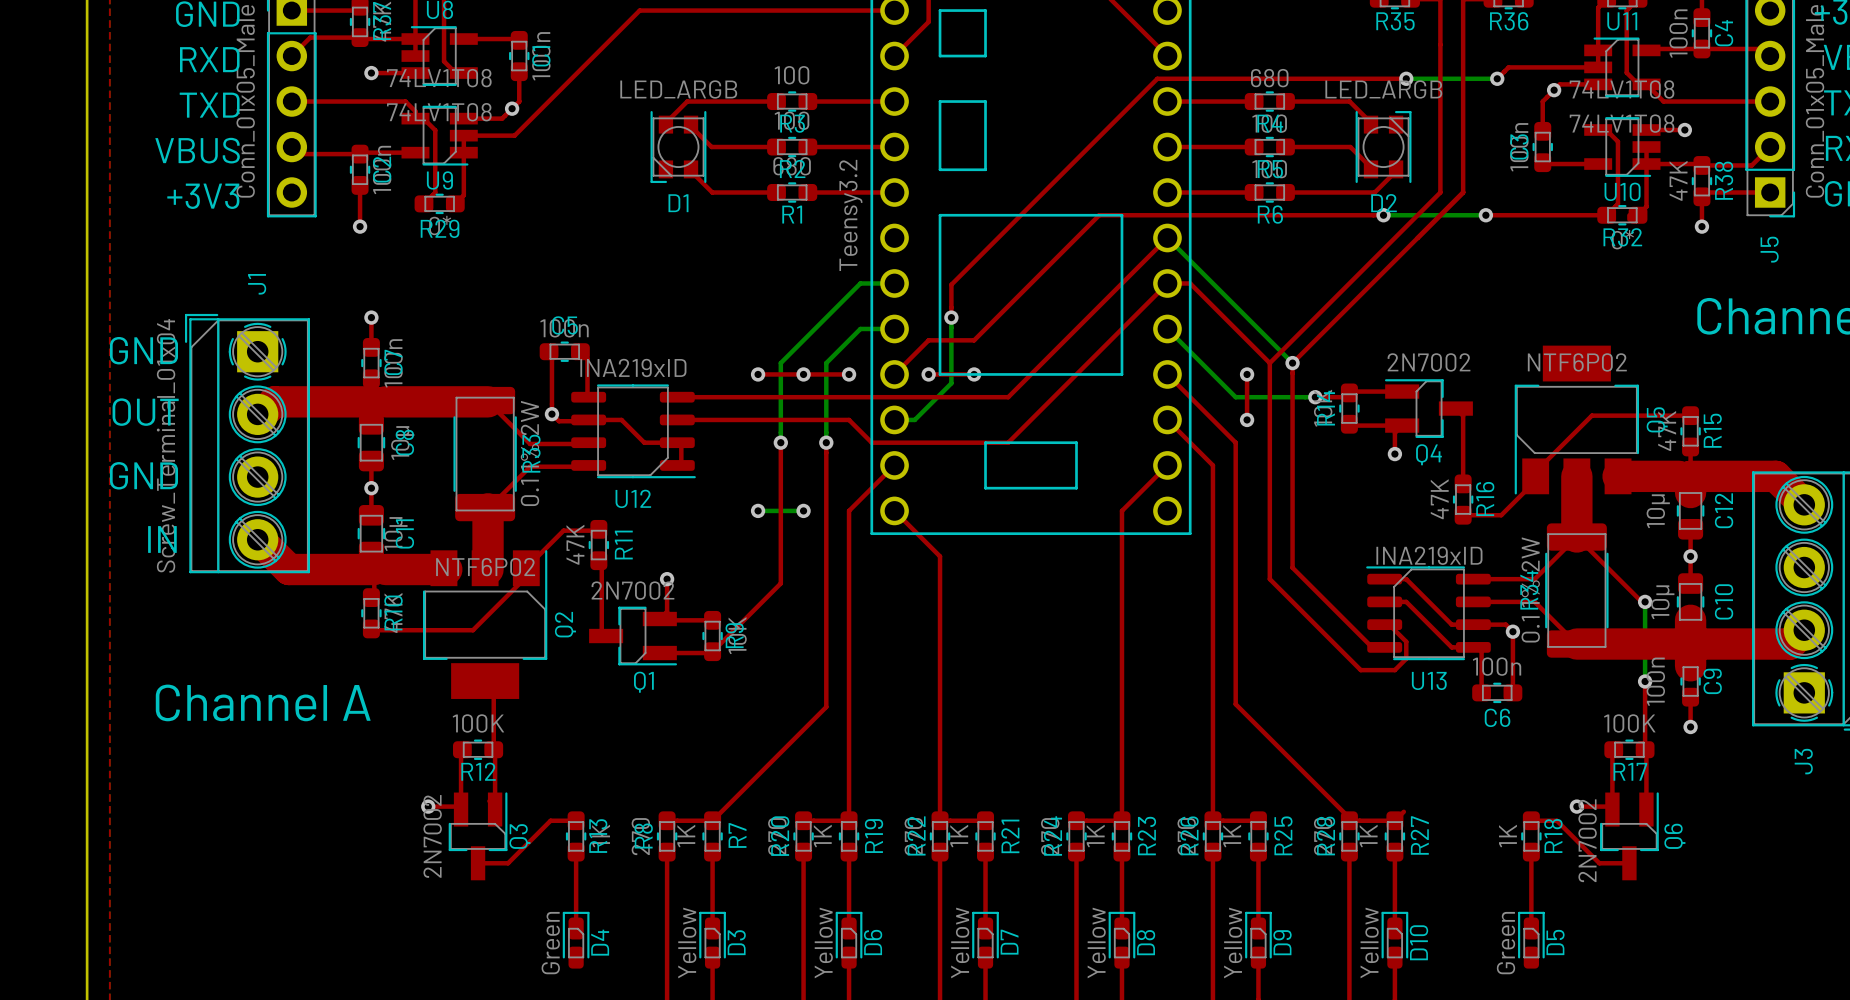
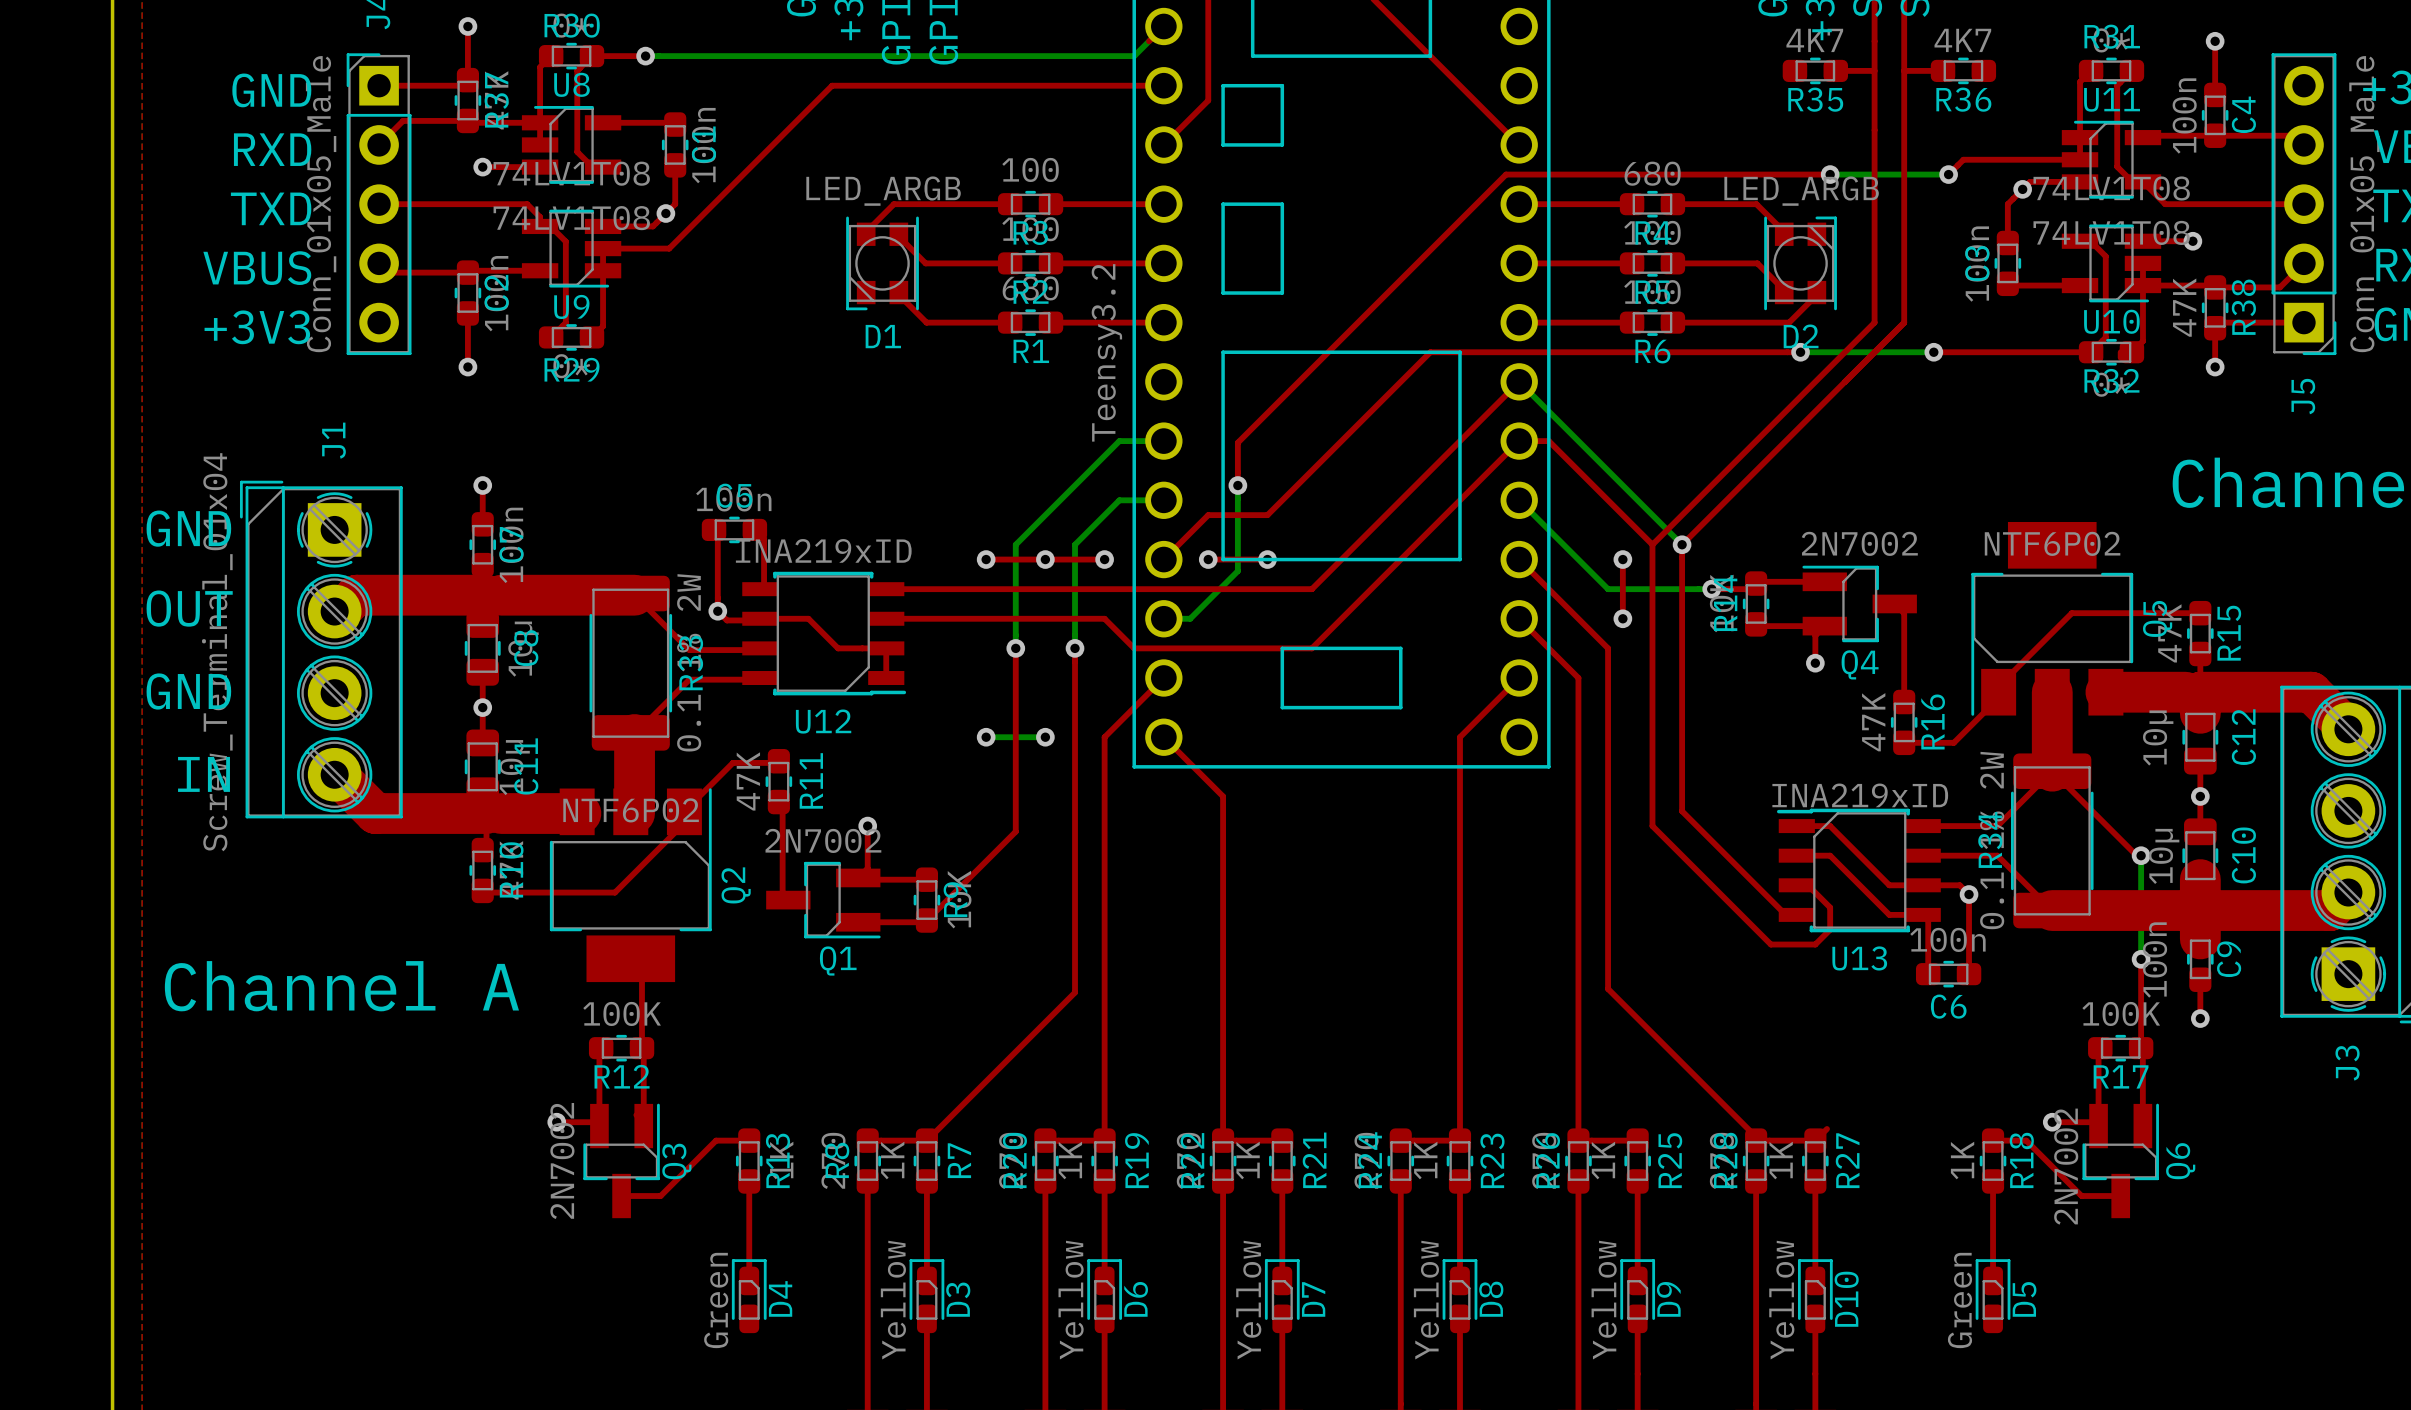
U12 footprint: [571, 384, 696, 479] -> [742, 571, 907, 696]
U13 footprint: [1366, 566, 1491, 661] -> [1777, 808, 1941, 933]

